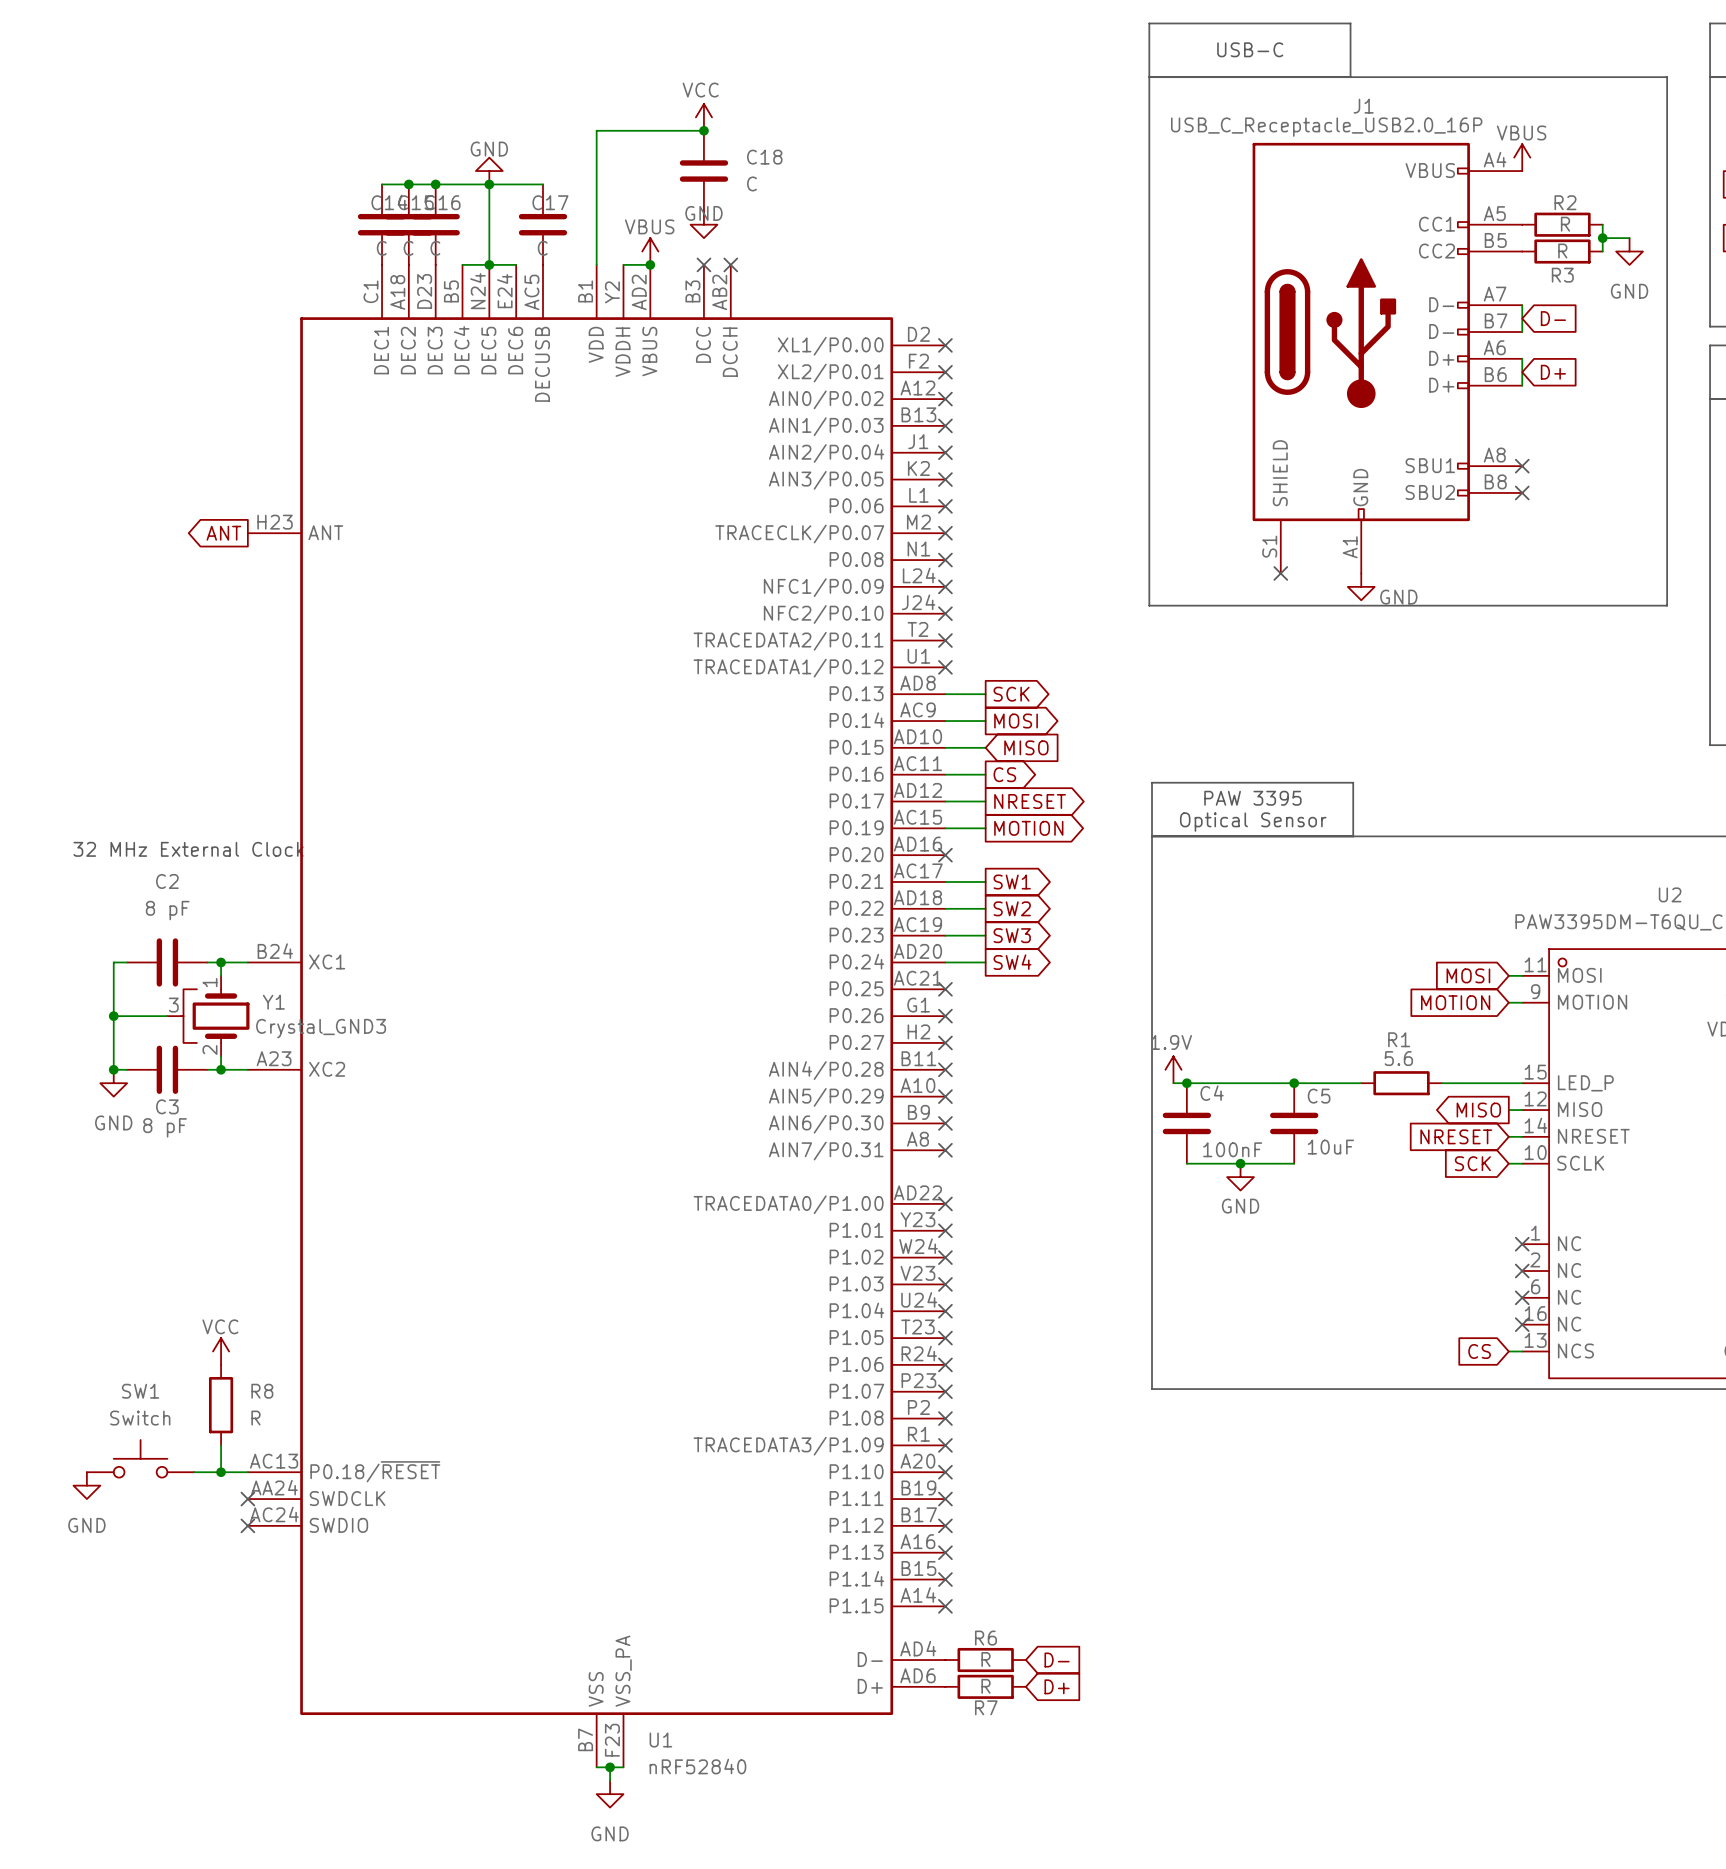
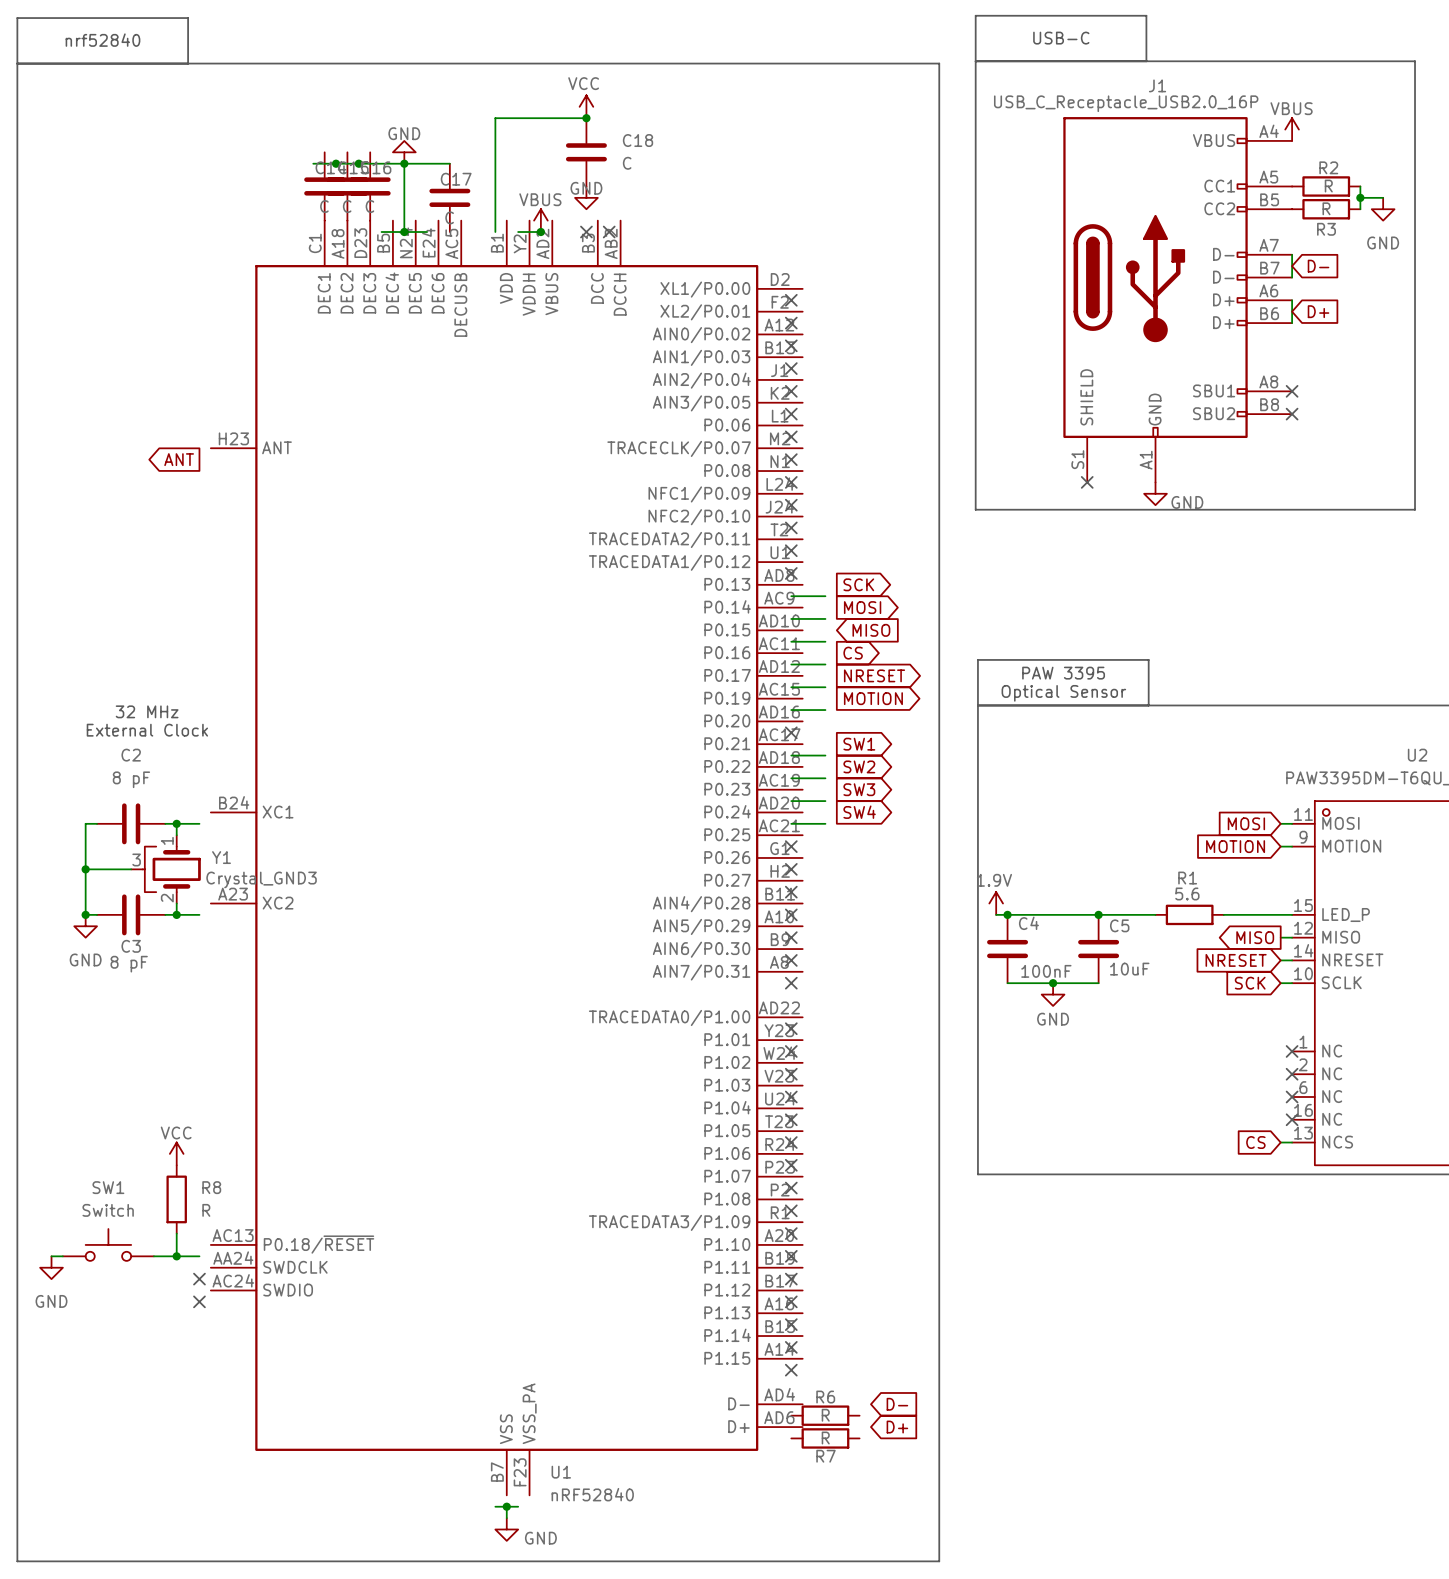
text: none -> nrf52840 (102, 40)
line: none -> (17, 63) (939, 63) (939, 1561) (17, 1561) (17, 18) (188, 18) (188, 63)
power symbol position: VCC (703, 117) -> VCC (586, 106)
wire: (703, 130) (596, 130) (596, 264) -> (586, 118) (495, 118) (495, 232)
junction position: (703, 130) -> (586, 118)
power symbol position: GND (489, 171) -> GND (404, 152)
C18 position: (703, 171) -> (586, 152)
wire: (382, 184) (542, 184) -> (313, 163) (449, 163)
junction: (408, 184) -> none
junction: (435, 184) -> none
wire: (489, 184) (489, 264) -> (404, 163) (404, 232)
junction position: (489, 184) -> (404, 163)
junction: none -> (336, 163)
junction: none -> (358, 163)
C17 position: (542, 224) -> (449, 197)
power symbol position: GND (703, 224) -> GND (586, 197)
power symbol position: VBUS (650, 251) -> VBUS (540, 220)
wire: (462, 264) (516, 264) -> (381, 232) (427, 232)
junction position: (489, 264) -> (404, 232)
wire: (623, 264) (650, 264) -> (518, 232) (540, 232)
junction position: (650, 264) -> (540, 232)
no-connect mark: (703, 264) -> none
no-connect mark: (730, 264) -> none
no-connect mark: none -> (586, 232)
no-connect mark: none -> (609, 232)
no-connect mark: (945, 345) -> none
no-connect mark: none -> (791, 300)
no-connect mark: (945, 372) -> none
no-connect mark: none -> (791, 323)
no-connect mark: (945, 399) -> none
no-connect mark: none -> (791, 345)
no-connect mark: (945, 425) -> none
no-connect mark: none -> (791, 368)
no-connect mark: (945, 452) -> none
no-connect mark: none -> (791, 391)
no-connect mark: (945, 479) -> none
no-connect mark: none -> (791, 414)
no-connect mark: (945, 506) -> none
no-connect mark: none -> (791, 436)
global label position: ANT (223, 533) -> ANT (179, 459)
no-connect mark: (945, 533) -> none
no-connect mark: none -> (791, 459)
no-connect mark: (945, 560) -> none
no-connect mark: none -> (791, 482)
no-connect mark: (945, 586) -> none
no-connect mark: none -> (791, 505)
no-connect mark: (945, 613) -> none
no-connect mark: none -> (791, 527)
no-connect mark: (945, 640) -> none
no-connect mark: none -> (791, 550)
no-connect mark: (945, 667) -> none
no-connect mark: none -> (791, 573)
wire: (945, 694) (985, 694) -> (791, 596) (825, 596)
wire: (945, 721) (985, 721) -> (791, 618) (825, 618)
wire: (945, 747) (985, 747) -> (791, 641) (825, 641)
wire: (945, 774) (985, 774) -> (791, 664) (825, 664)
wire: (945, 801) (985, 801) -> (791, 687) (825, 687)
wire: (945, 828) (985, 828) -> (791, 710) (825, 710)
text: none -> 32 MHz (147, 711)
text: 32 MHz External Clock (188, 849) -> External Clock (147, 730)
no-connect mark position: (945, 855) -> (791, 732)
wire: (945, 881) (985, 881) -> (791, 755) (825, 755)
wire: (945, 908) (985, 908) -> (791, 778) (825, 778)
wire: (945, 935) (985, 935) -> (791, 801) (825, 801)
wire: (127, 962) (113, 962) (113, 1069) (127, 1069) -> (97, 823) (85, 823) (85, 914) (97, 914)
C2 position: (167, 962) -> (131, 823)
wire: (207, 962) (247, 962) -> (165, 823) (199, 823)
wire: (221, 962) (221, 975) -> (176, 823) (176, 835)
junction position: (221, 962) -> (176, 823)
wire: (945, 962) (985, 962) -> (791, 823) (825, 823)
no-connect mark: (945, 989) -> none
no-connect mark: none -> (791, 846)
wire: (113, 1016) (167, 1016) -> (85, 869) (131, 869)
junction position: (113, 1016) -> (85, 869)
Y1 position: (208, 1016) -> (166, 869)
no-connect mark: (945, 1016) -> none
no-connect mark: none -> (791, 869)
no-connect mark: (945, 1042) -> none
wire: (221, 1056) (221, 1069) -> none
no-connect mark: none -> (791, 892)
junction position: (113, 1069) -> (85, 914)
C3 position: (167, 1069) -> (131, 914)
wire: (207, 1069) (247, 1069) -> (176, 903) (176, 914)
junction position: (221, 1069) -> (176, 914)
no-connect mark: (945, 1069) -> none
power symbol position: GND (113, 1083) -> GND (85, 926)
wire: none -> (165, 914) (199, 914)
no-connect mark: none -> (791, 914)
no-connect mark: (945, 1096) -> none
no-connect mark: none -> (791, 937)
no-connect mark: (945, 1123) -> none
no-connect mark: none -> (791, 960)
no-connect mark: (945, 1150) -> none
no-connect mark: none -> (791, 983)
no-connect mark: (945, 1203) -> none
no-connect mark: none -> (791, 1028)
no-connect mark: (945, 1230) -> none
no-connect mark: none -> (791, 1051)
no-connect mark: (945, 1257) -> none
no-connect mark: none -> (791, 1074)
no-connect mark: (945, 1284) -> none
no-connect mark: none -> (791, 1096)
no-connect mark: (945, 1311) -> none
no-connect mark: none -> (791, 1119)
no-connect mark: (945, 1338) -> none
power symbol position: VCC (221, 1351) -> VCC (176, 1153)
no-connect mark: none -> (791, 1142)
no-connect mark: (945, 1364) -> none
no-connect mark: none -> (791, 1165)
no-connect mark: (945, 1391) -> none
R8 position: (221, 1405) -> (176, 1199)
no-connect mark: none -> (791, 1188)
no-connect mark: (945, 1418) -> none
no-connect mark: none -> (791, 1210)
wire: (221, 1445) (221, 1472) -> (176, 1233) (176, 1256)
no-connect mark: (945, 1445) -> none
SW1 position: (140, 1458) -> (108, 1244)
no-connect mark: none -> (791, 1233)
wire: (194, 1472) (247, 1472) -> (153, 1256) (199, 1256)
junction position: (221, 1472) -> (176, 1256)
no-connect mark: (945, 1472) -> none
wire: none -> (51, 1256) (62, 1256)
power symbol position: GND (86, 1485) -> GND (51, 1267)
no-connect mark: none -> (791, 1256)
no-connect mark: (247, 1499) -> none
no-connect mark: (945, 1499) -> none
no-connect mark: none -> (199, 1279)
no-connect mark: none -> (791, 1279)
no-connect mark: (247, 1525) -> none
no-connect mark: (945, 1525) -> none
no-connect mark: none -> (199, 1301)
no-connect mark: none -> (791, 1301)
no-connect mark: (945, 1552) -> none
no-connect mark: none -> (791, 1324)
no-connect mark: (945, 1579) -> none
no-connect mark: none -> (791, 1347)
no-connect mark: (945, 1606) -> none
no-connect mark: none -> (791, 1370)
R6 position: (985, 1660) -> (825, 1415)
R7 position: (985, 1686) -> (825, 1438)
wire: (596, 1767) (623, 1767) -> none
wire: (610, 1767) (610, 1780) -> (495, 1506) (518, 1506)
junction position: (610, 1767) -> (506, 1506)
wire: none -> (506, 1506) (506, 1518)
power symbol position: GND (610, 1794) -> GND (506, 1529)
power symbol text position: GND (610, 1833) -> GND (540, 1538)

